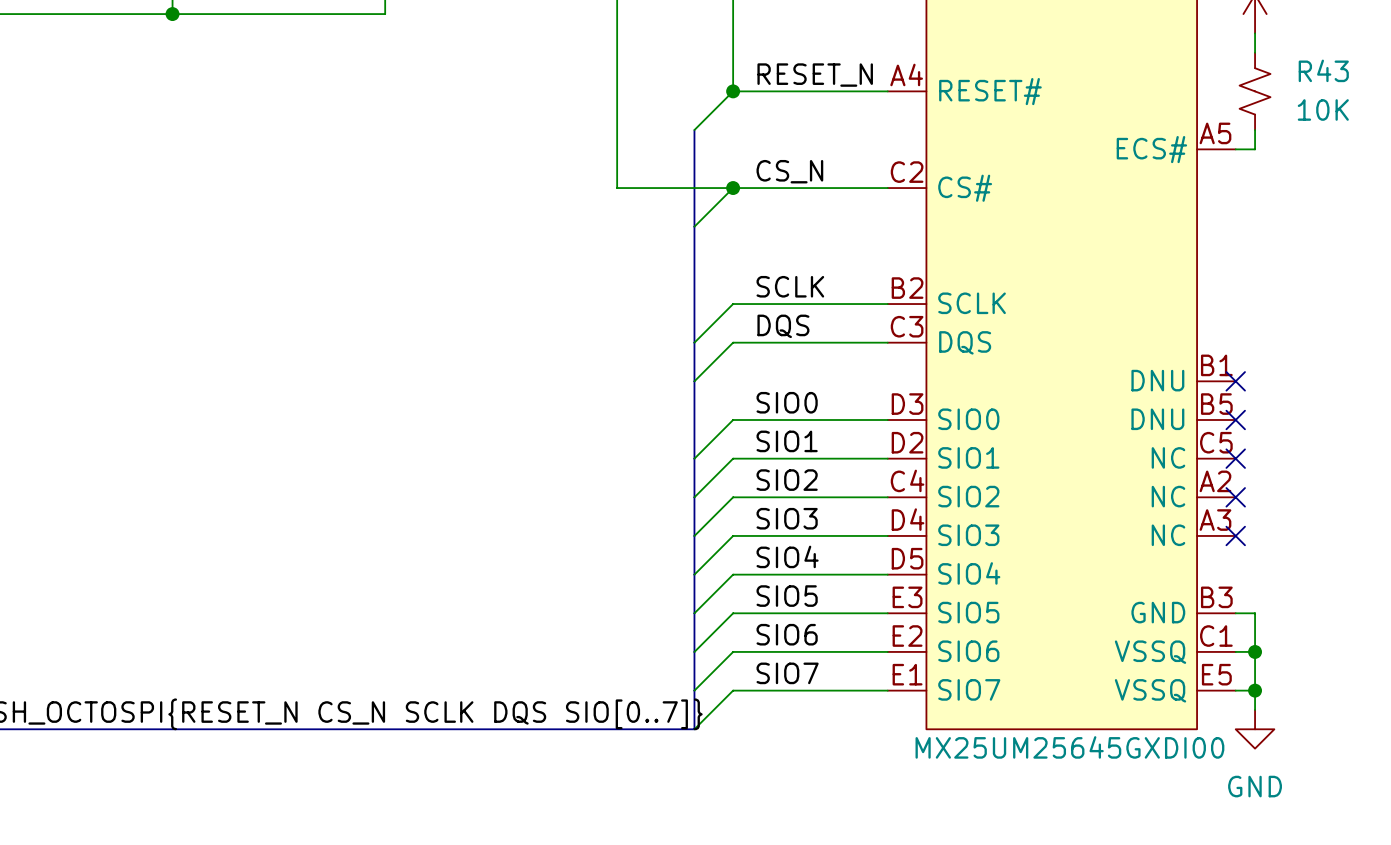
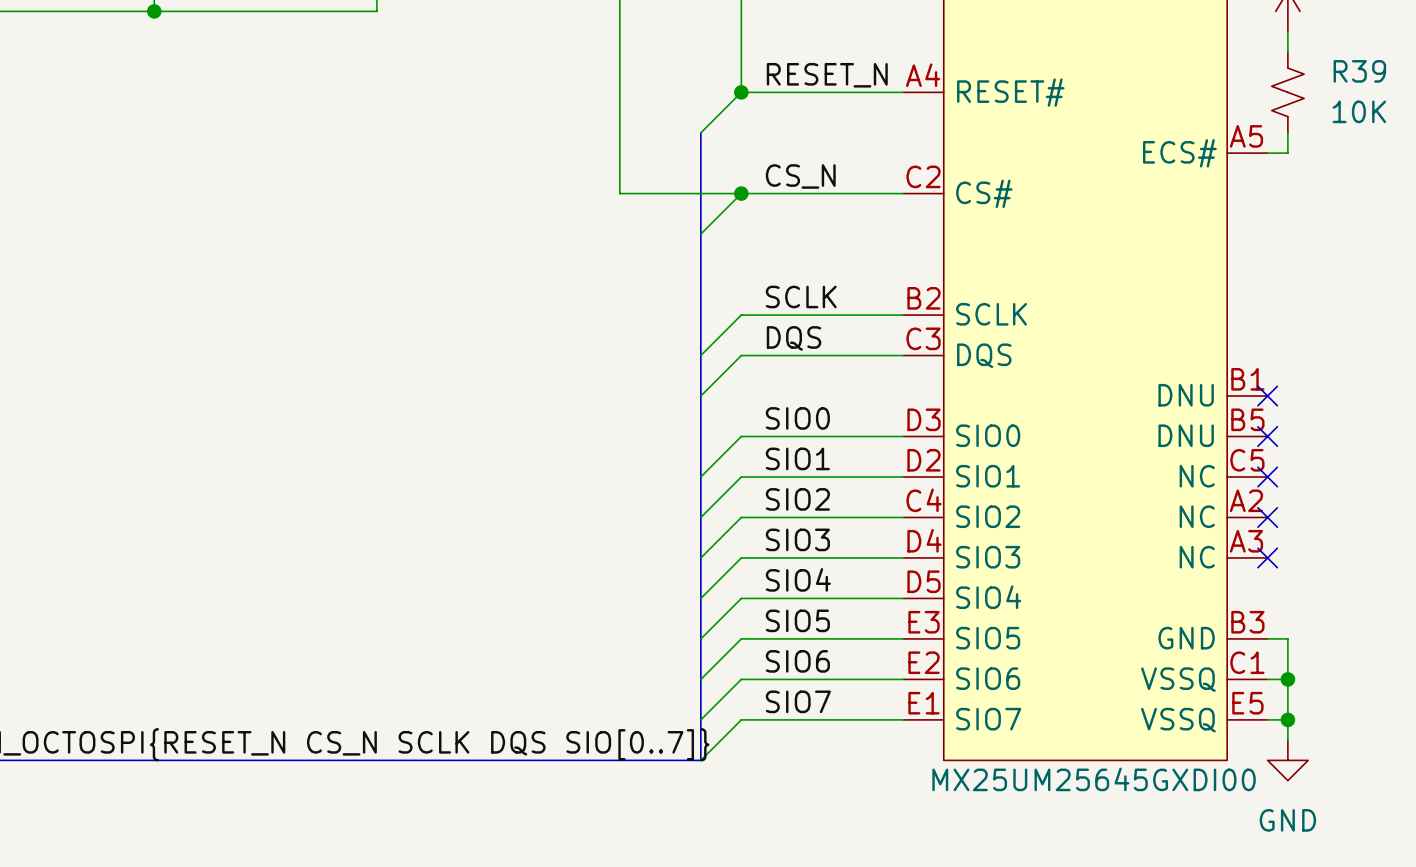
R43 name: R43 (1323, 70) -> R39 (1359, 71)

